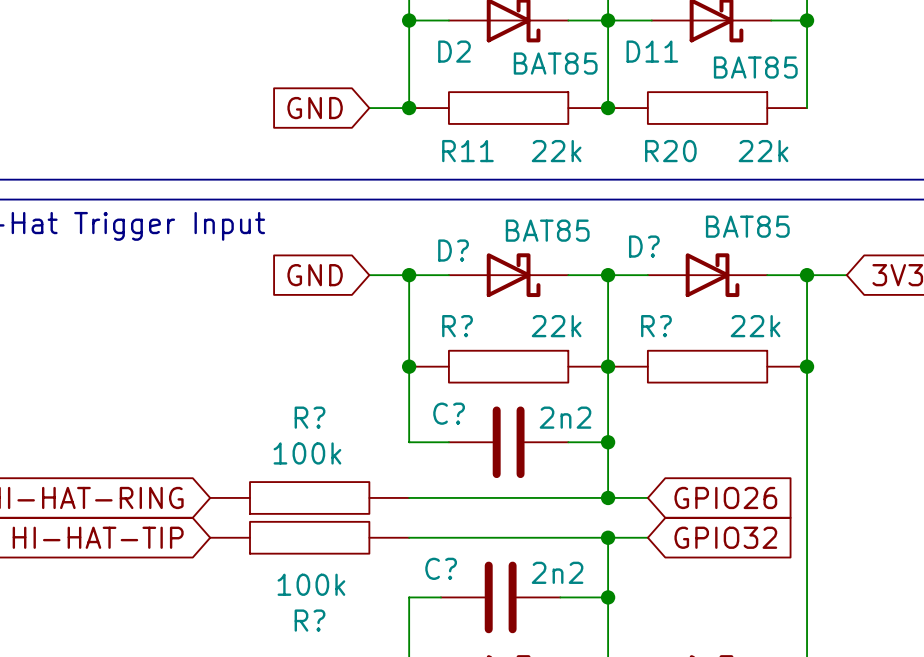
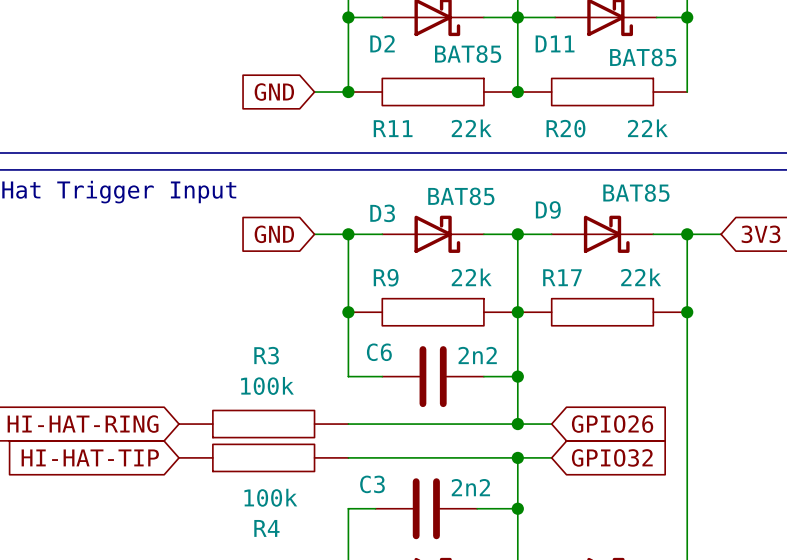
D? name: D? (644, 246) -> D9 (548, 209)
D? name: D? (453, 250) -> D3 (382, 213)
R? name: R? (457, 326) -> R9 (386, 277)
R? name: R? (656, 326) -> R17 (562, 277)
C? name: C? (449, 413) -> C6 (379, 352)
R? name: R? (310, 417) -> R3 (266, 355)
C? name: C? (441, 568) -> C3 (372, 484)
R? name: R? (310, 620) -> R4 (266, 528)

